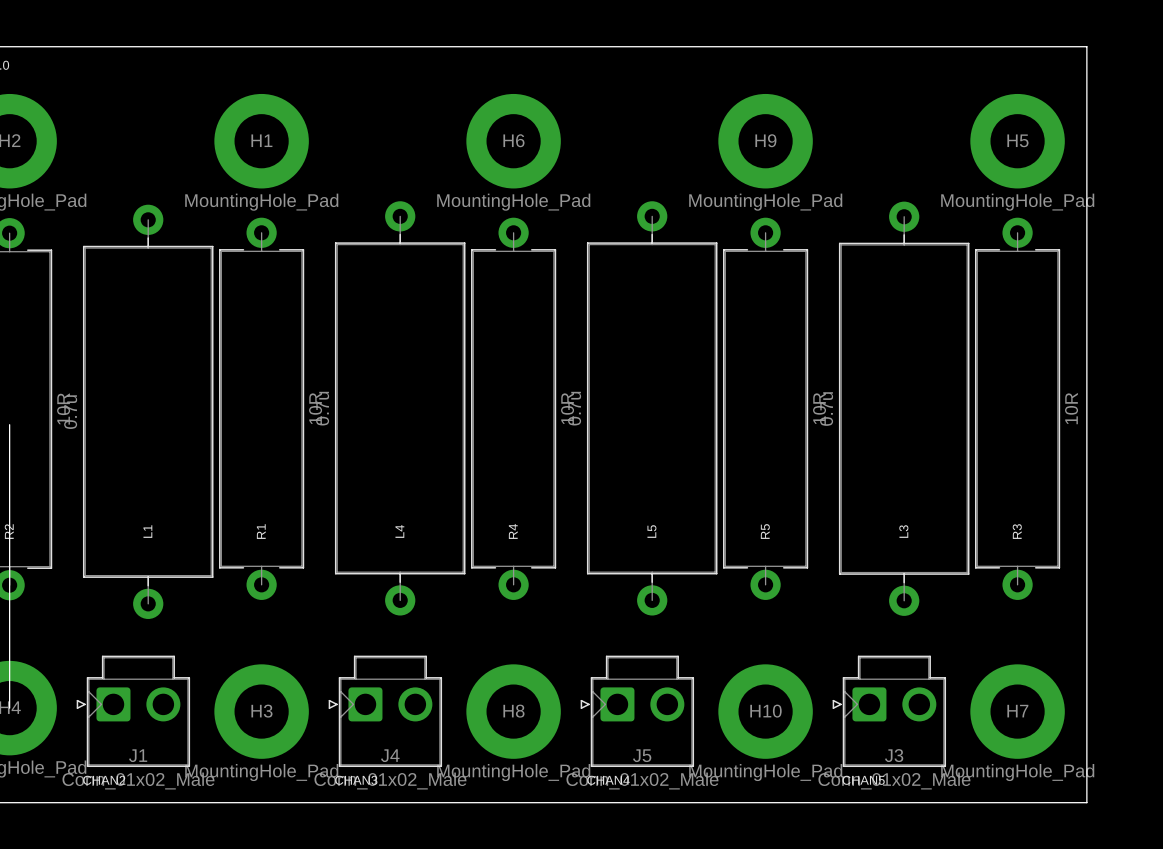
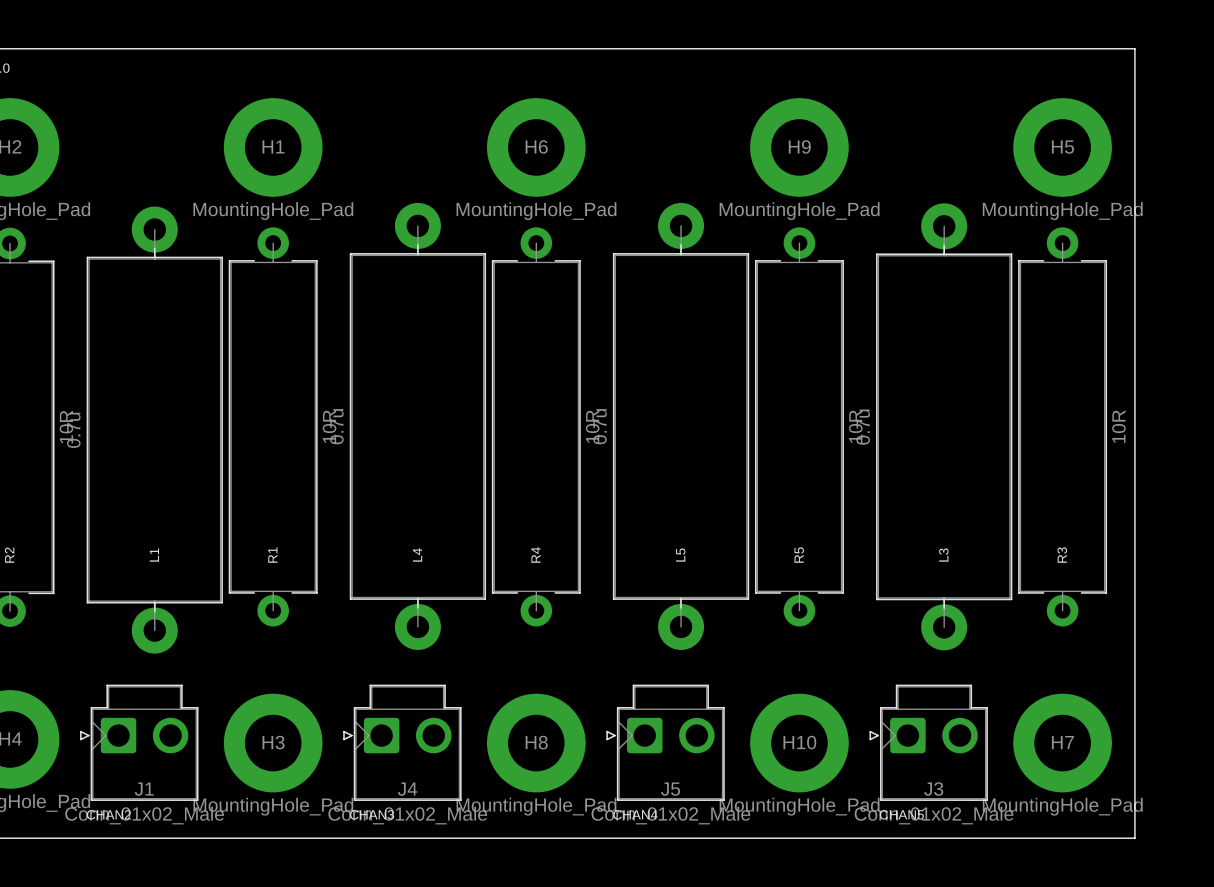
L4 footprint: [334, 201, 466, 616] -> [349, 202, 487, 650]
L5 footprint: [586, 201, 718, 616] -> [612, 202, 750, 650]
L3 footprint: [838, 201, 970, 616] -> [876, 203, 1013, 651]
L1 footprint: [82, 204, 214, 619] -> [86, 206, 223, 654]
board edge: (9, 424) (9, 708) -> none

